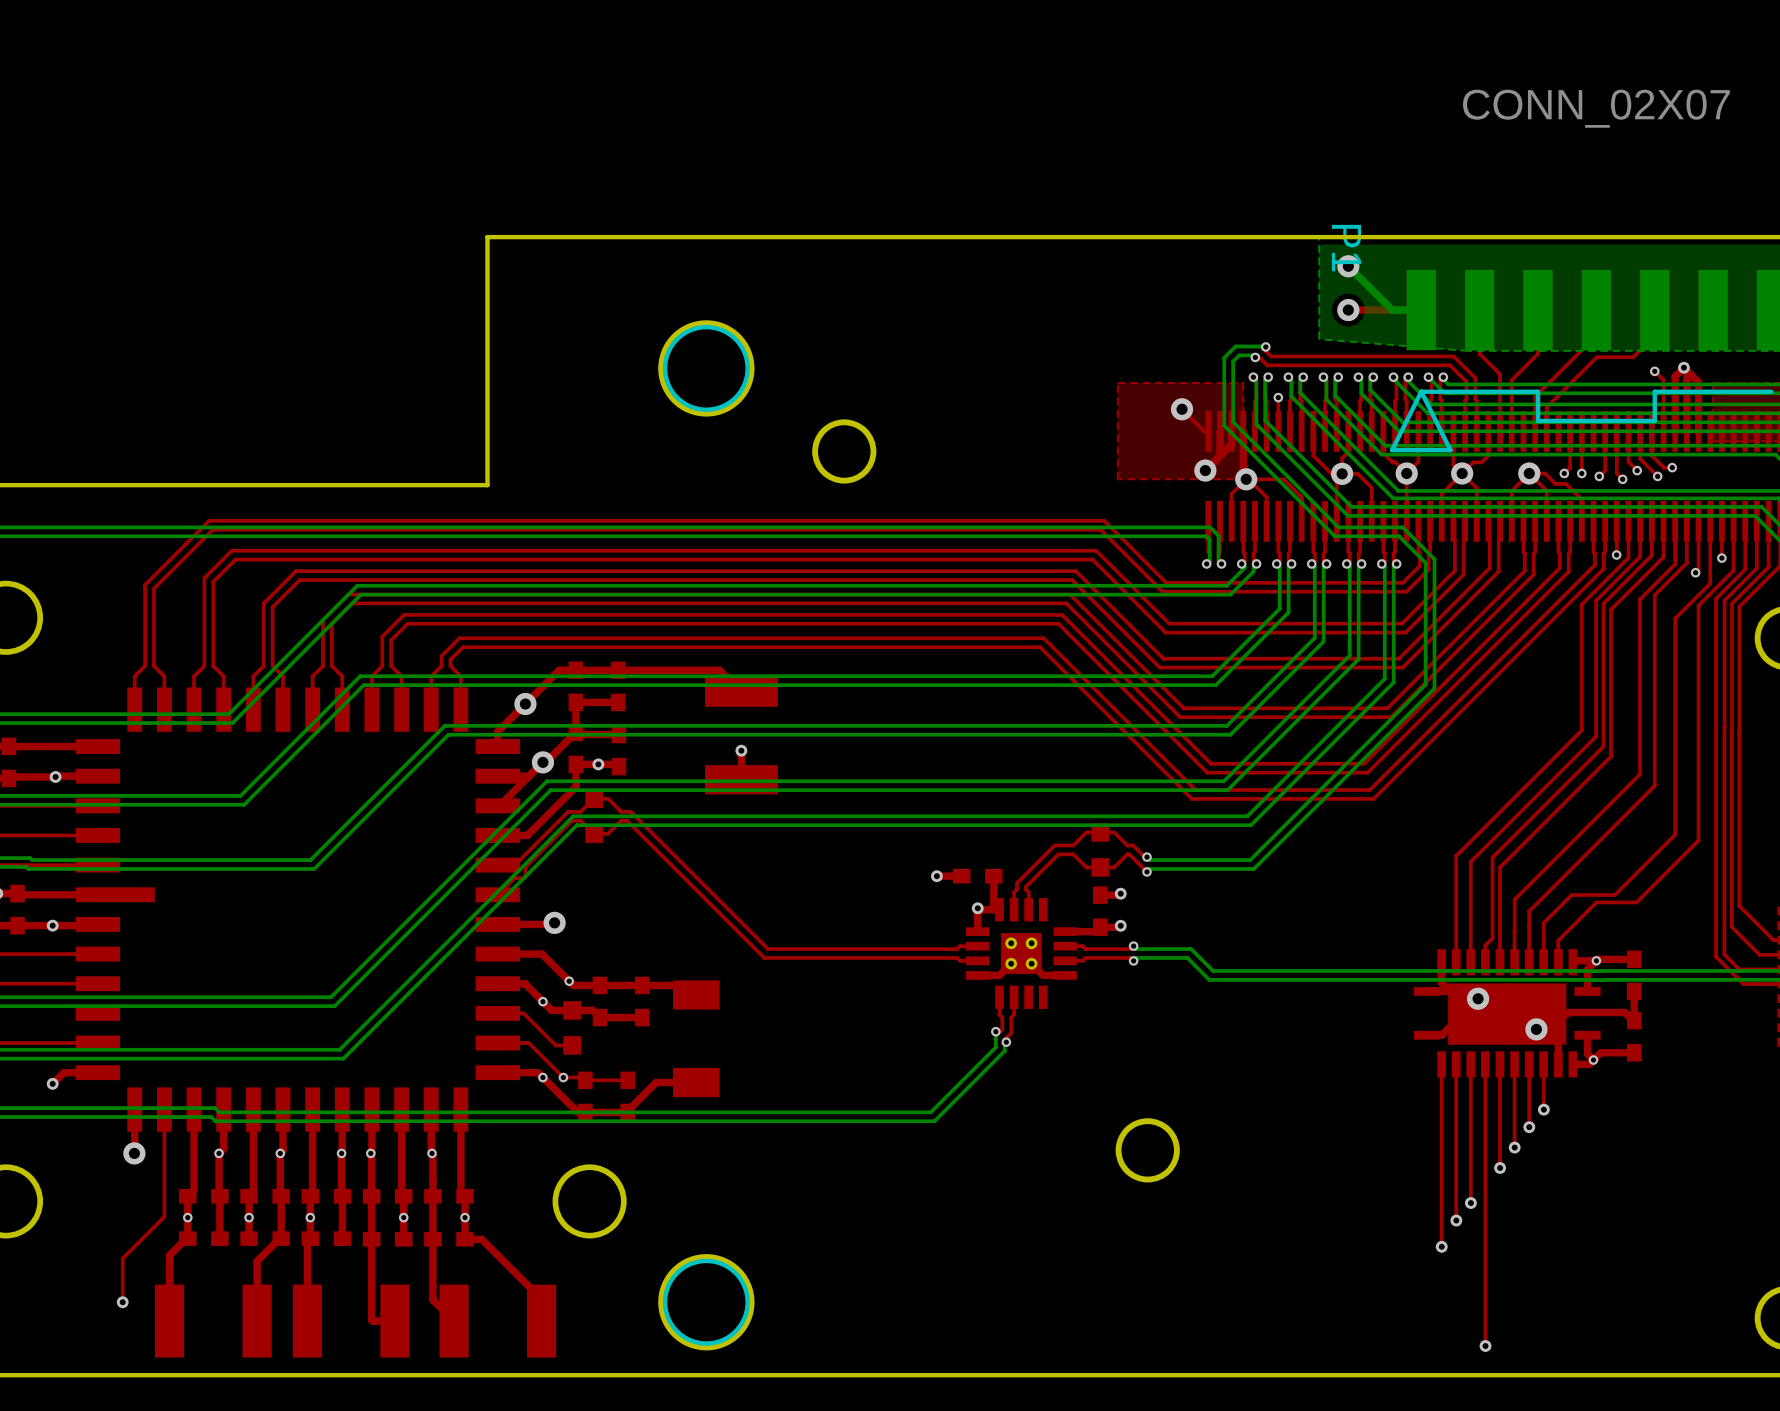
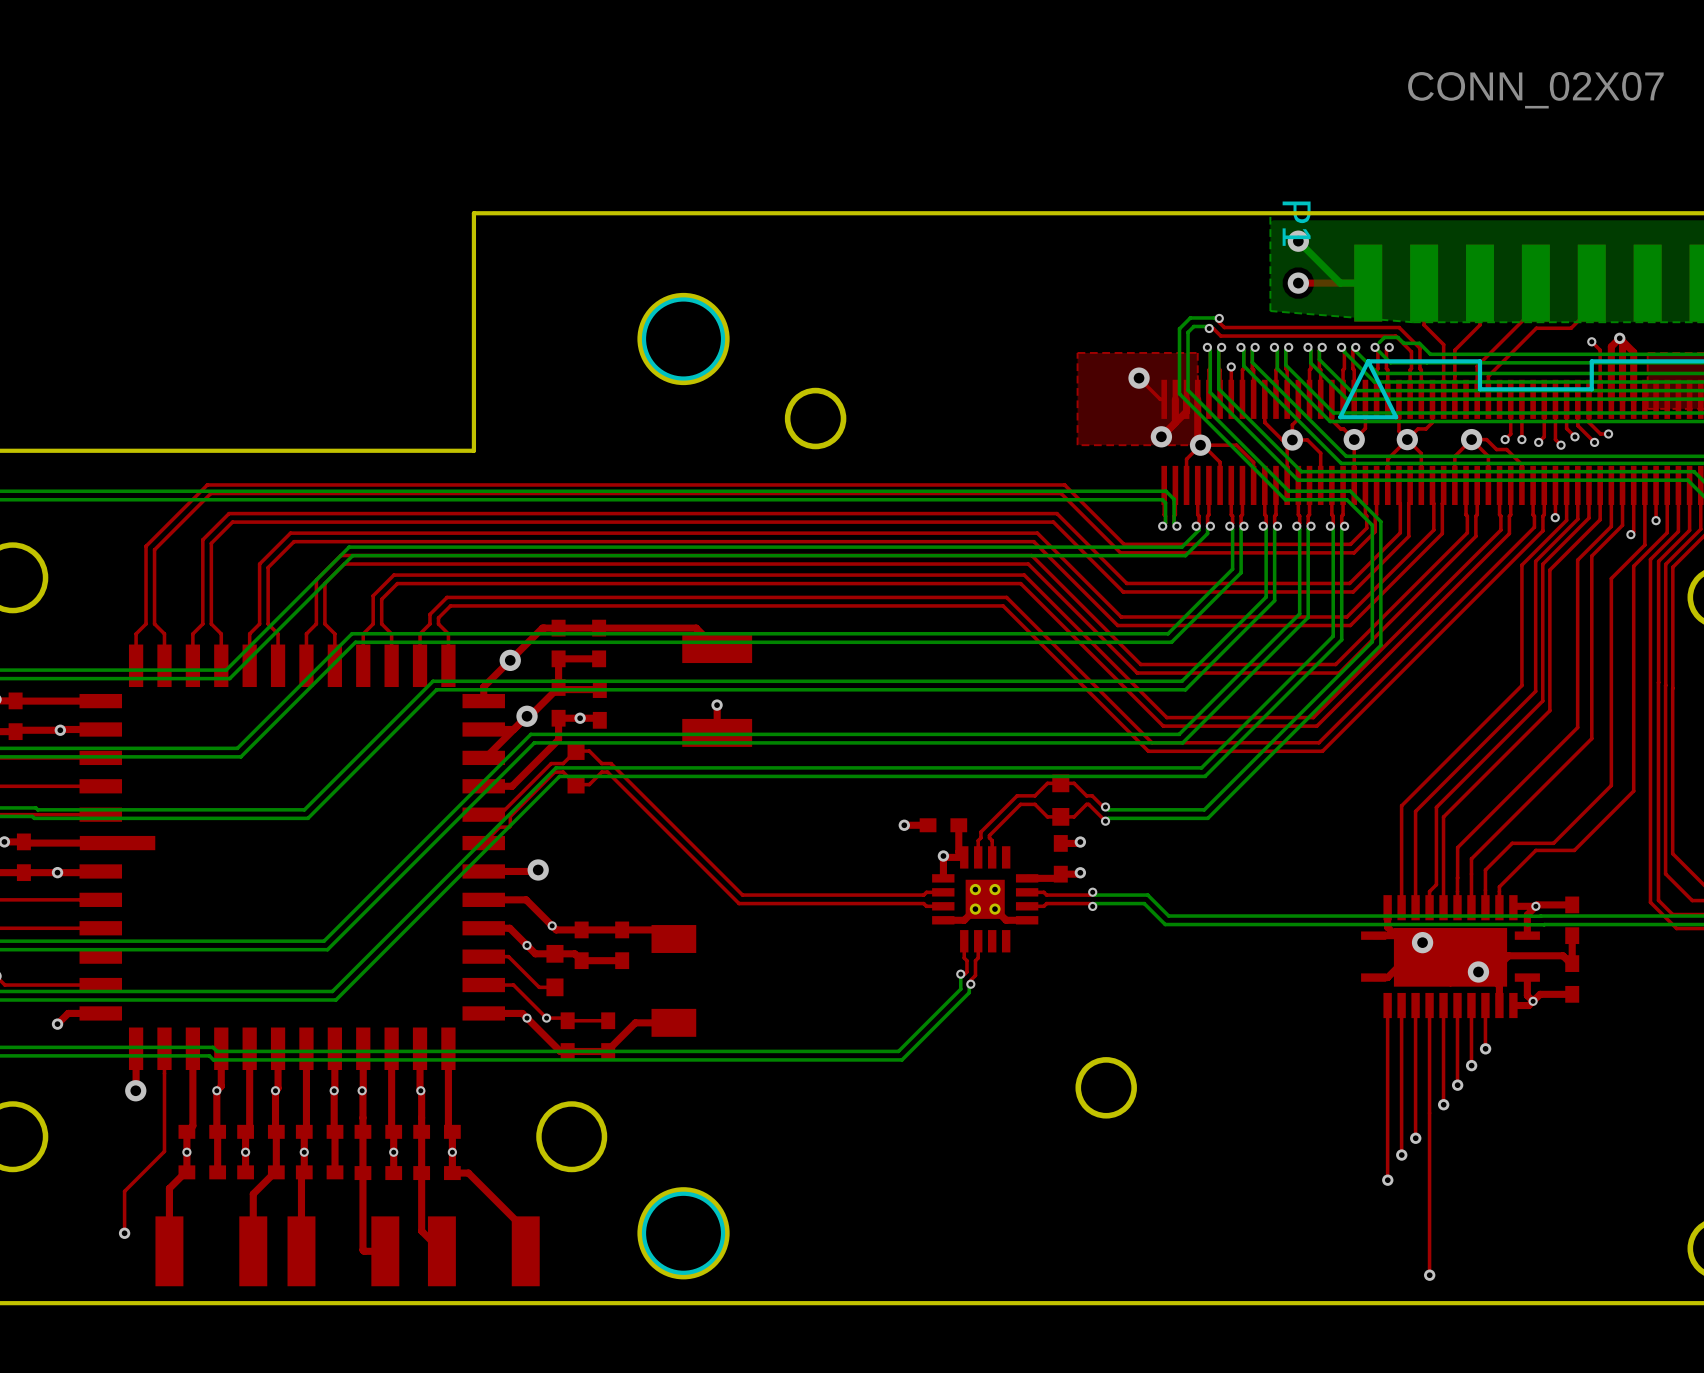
bottom track: (1443, 379) (1448, 384) (1486, 384) -> (1379, 342) (1384, 337) (1397, 337) (1403, 343) (1419, 343) (1430, 354)

